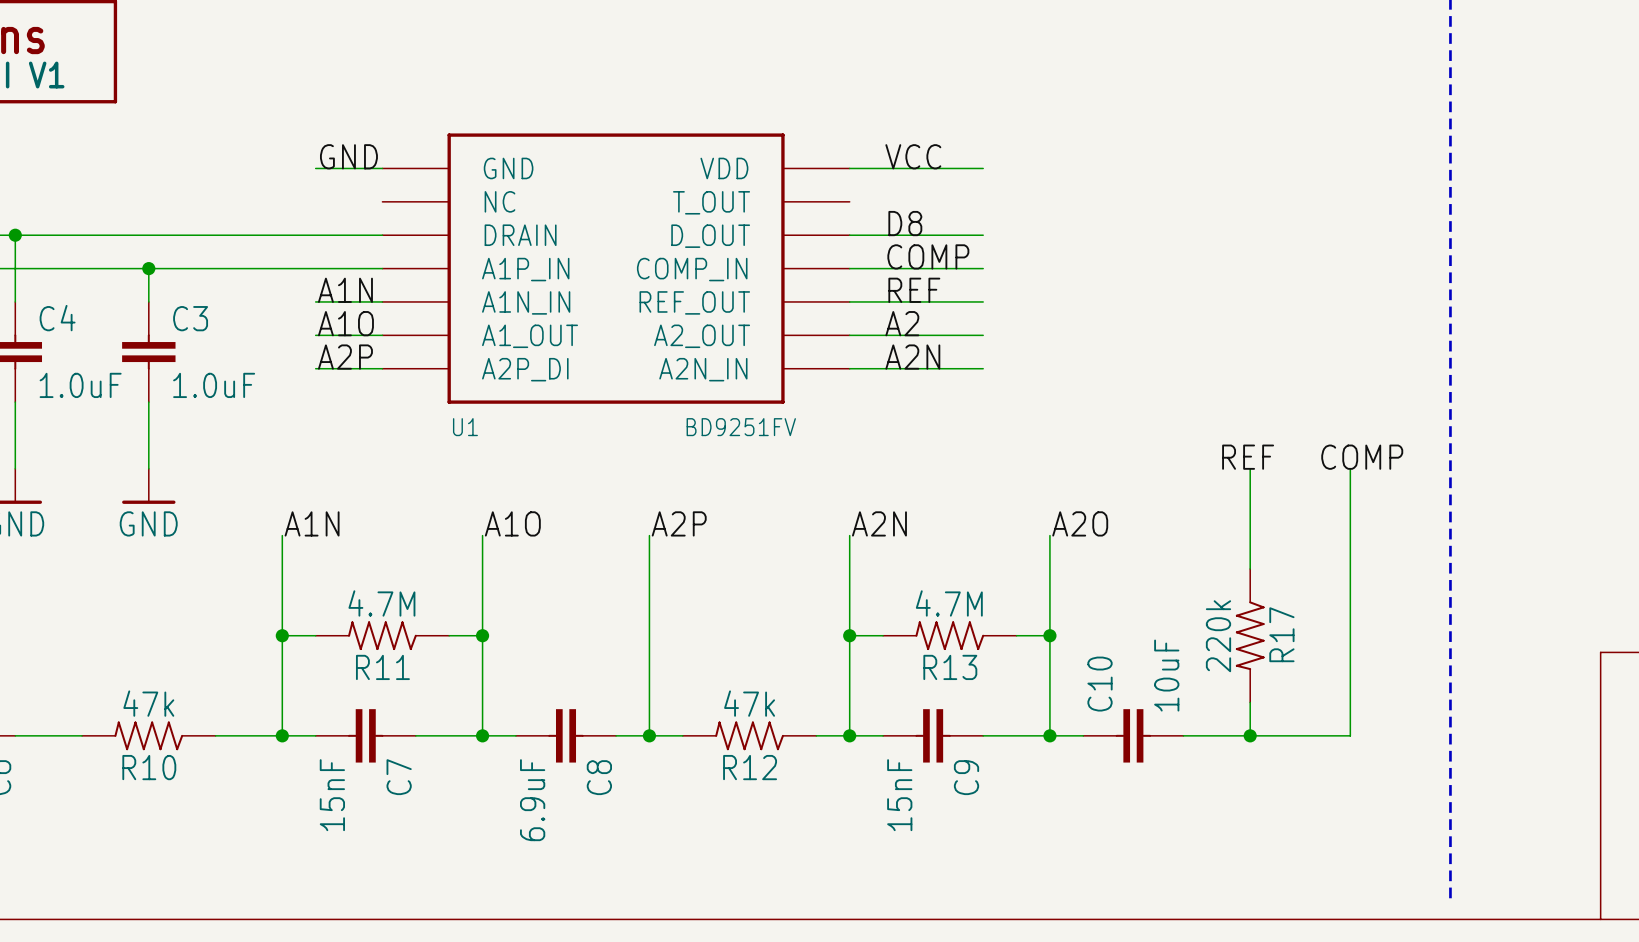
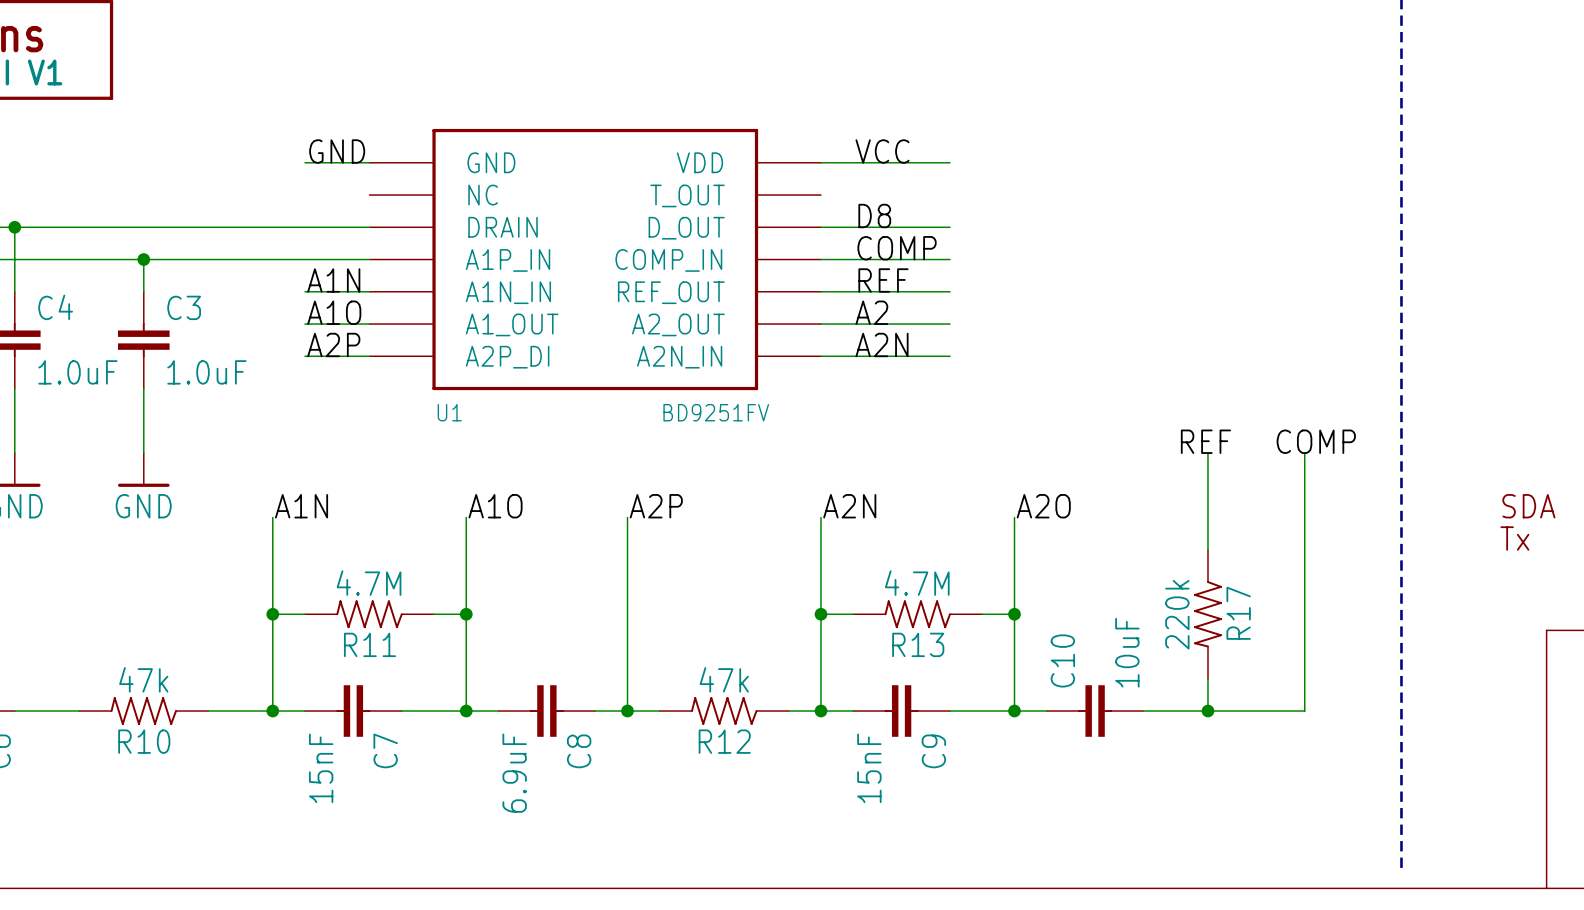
text: none -> SDA (1528, 506)
text: none -> Tx (1514, 538)

